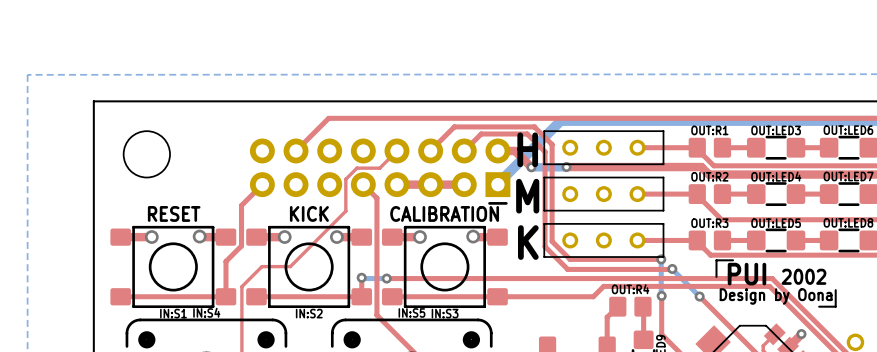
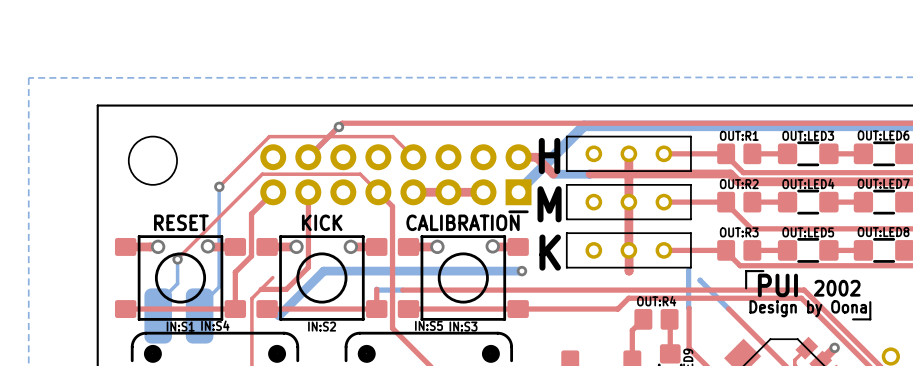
via: none -> (338, 126)
top track: none -> (628, 153) (628, 270)
top track: (396, 150) (379, 168) (356, 168) (345, 179) (345, 211) (290, 266) (261, 266) -> (413, 157) (392, 136) (269, 136) (219, 186)
top track: (430, 150) (454, 126) (534, 126) (552, 144) (552, 241) (570, 259) (661, 259) -> none
top track: (464, 150) (481, 133) (527, 133) (545, 151) (545, 246) (567, 269) (672, 268) -> none
via: (531, 167) -> none
via: (566, 167) -> none
bottom track: none -> (219, 186) (219, 287) (199, 306) (199, 315)
via: none -> (219, 186)
top track: none -> (308, 192) (308, 267) (286, 289) (261, 289)
top track: none -> (378, 192) (360, 174) (262, 174) (177, 259)
bottom track: none -> (177, 259) (177, 283) (158, 303) (158, 315)
via: none -> (177, 259)
via: (661, 259) -> none
bottom track: none -> (521, 271) (323, 271) (278, 315)
via: none -> (521, 271)
via: (672, 268) -> none
via: (361, 277) -> none
via: (386, 278) -> none
via: (661, 295) -> none
via: (699, 296) -> none
part: none -> (158, 315)
part: none -> (199, 315)

